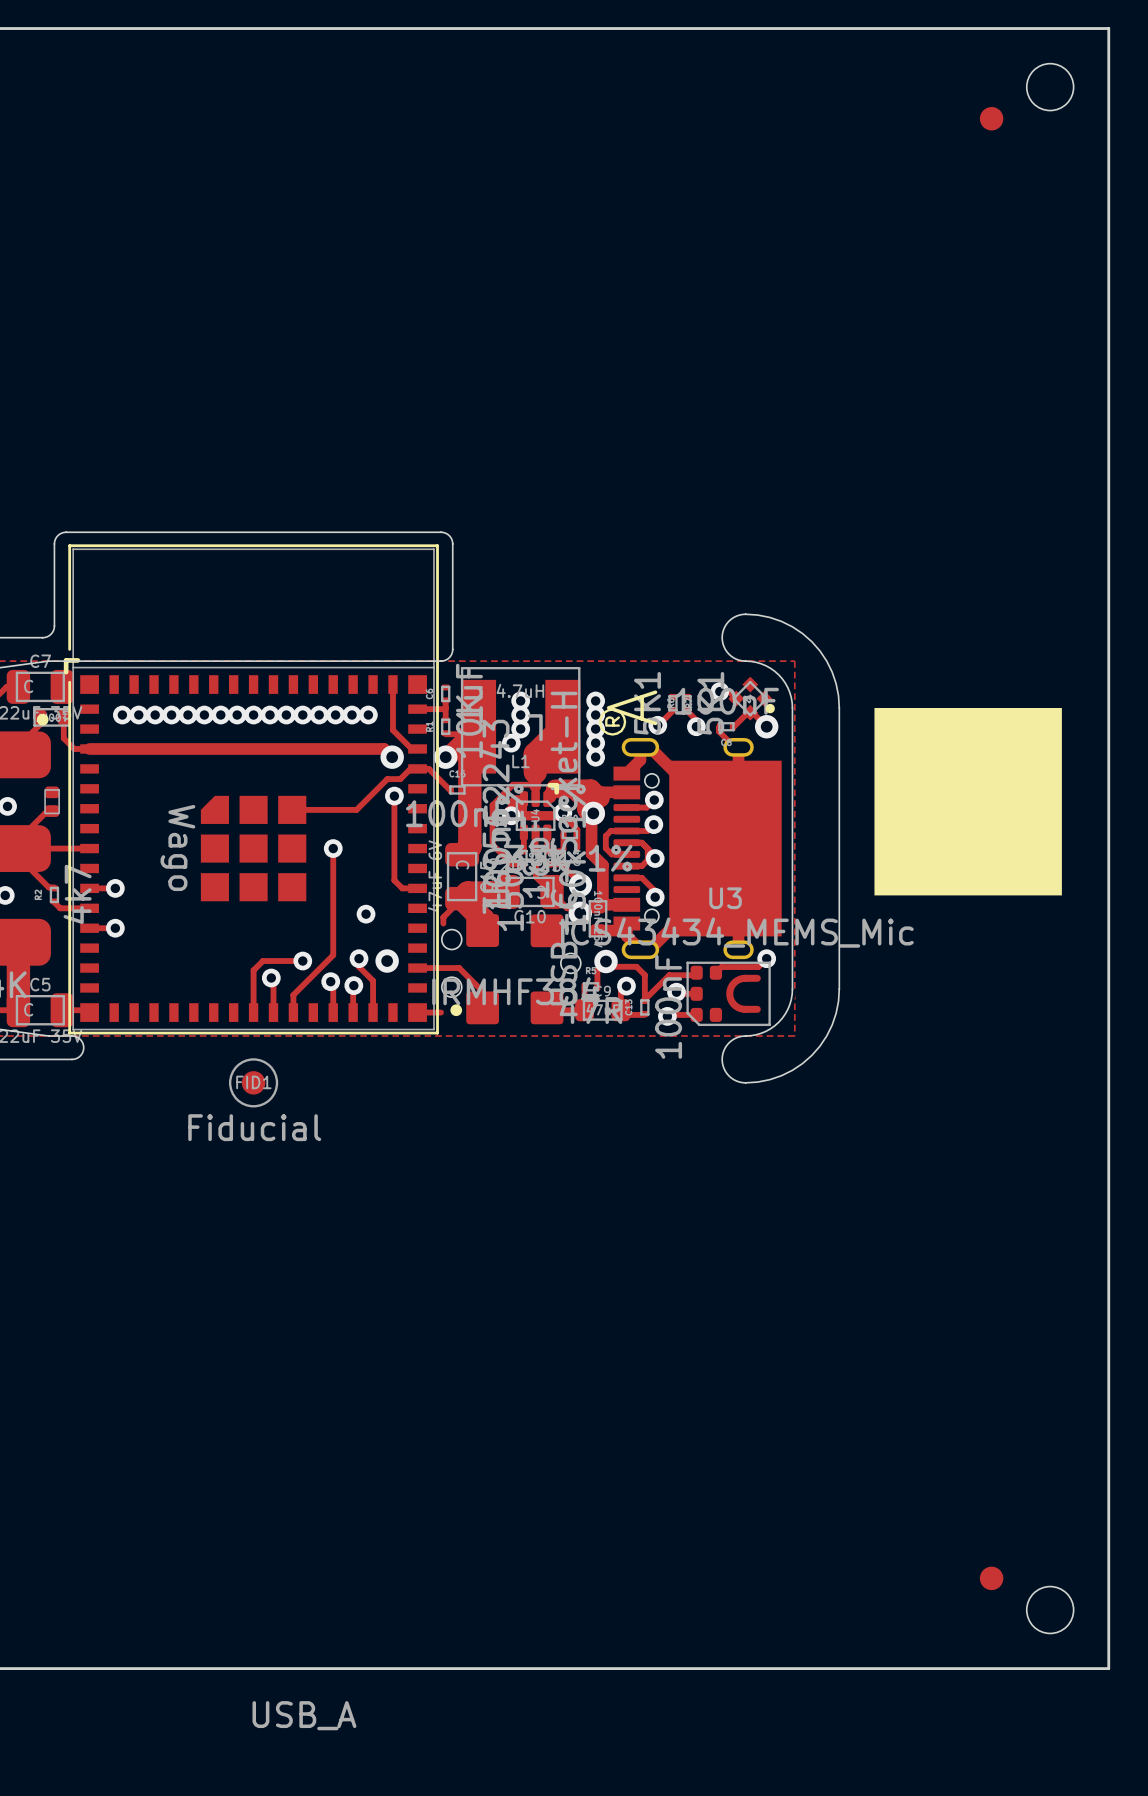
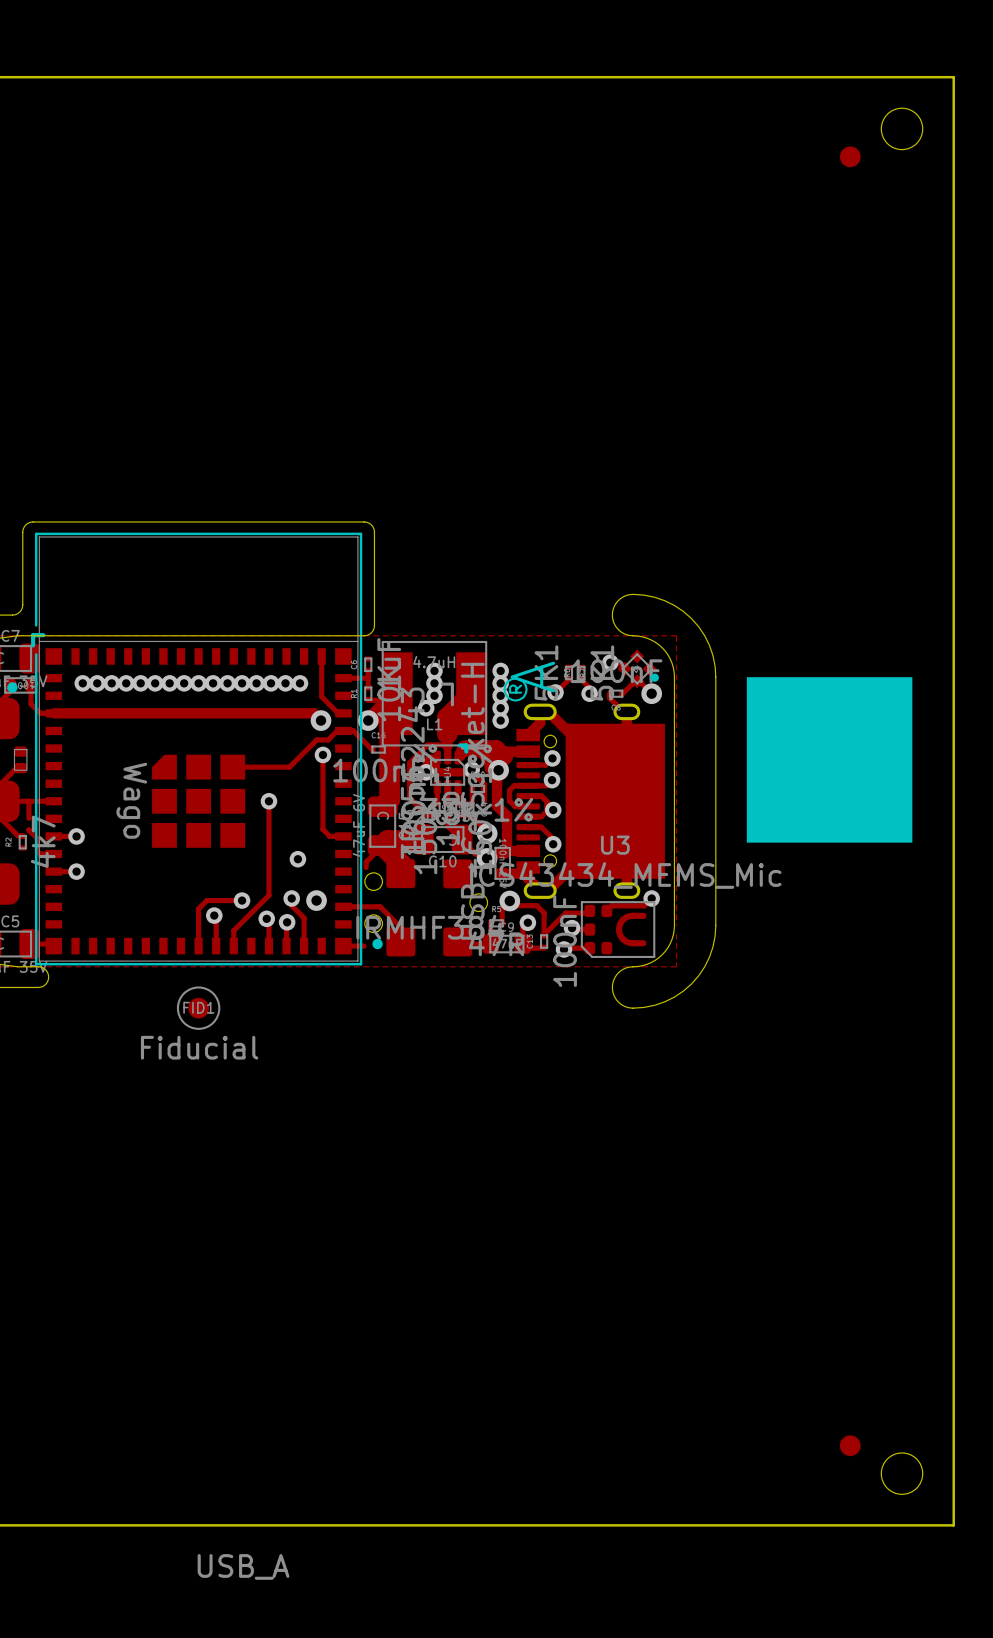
track: none -> (28, 801) (28, 818)
track: (54, 902) (60, 908) (74, 908) -> (28, 829) (37, 838) (37, 850) (40, 854)

